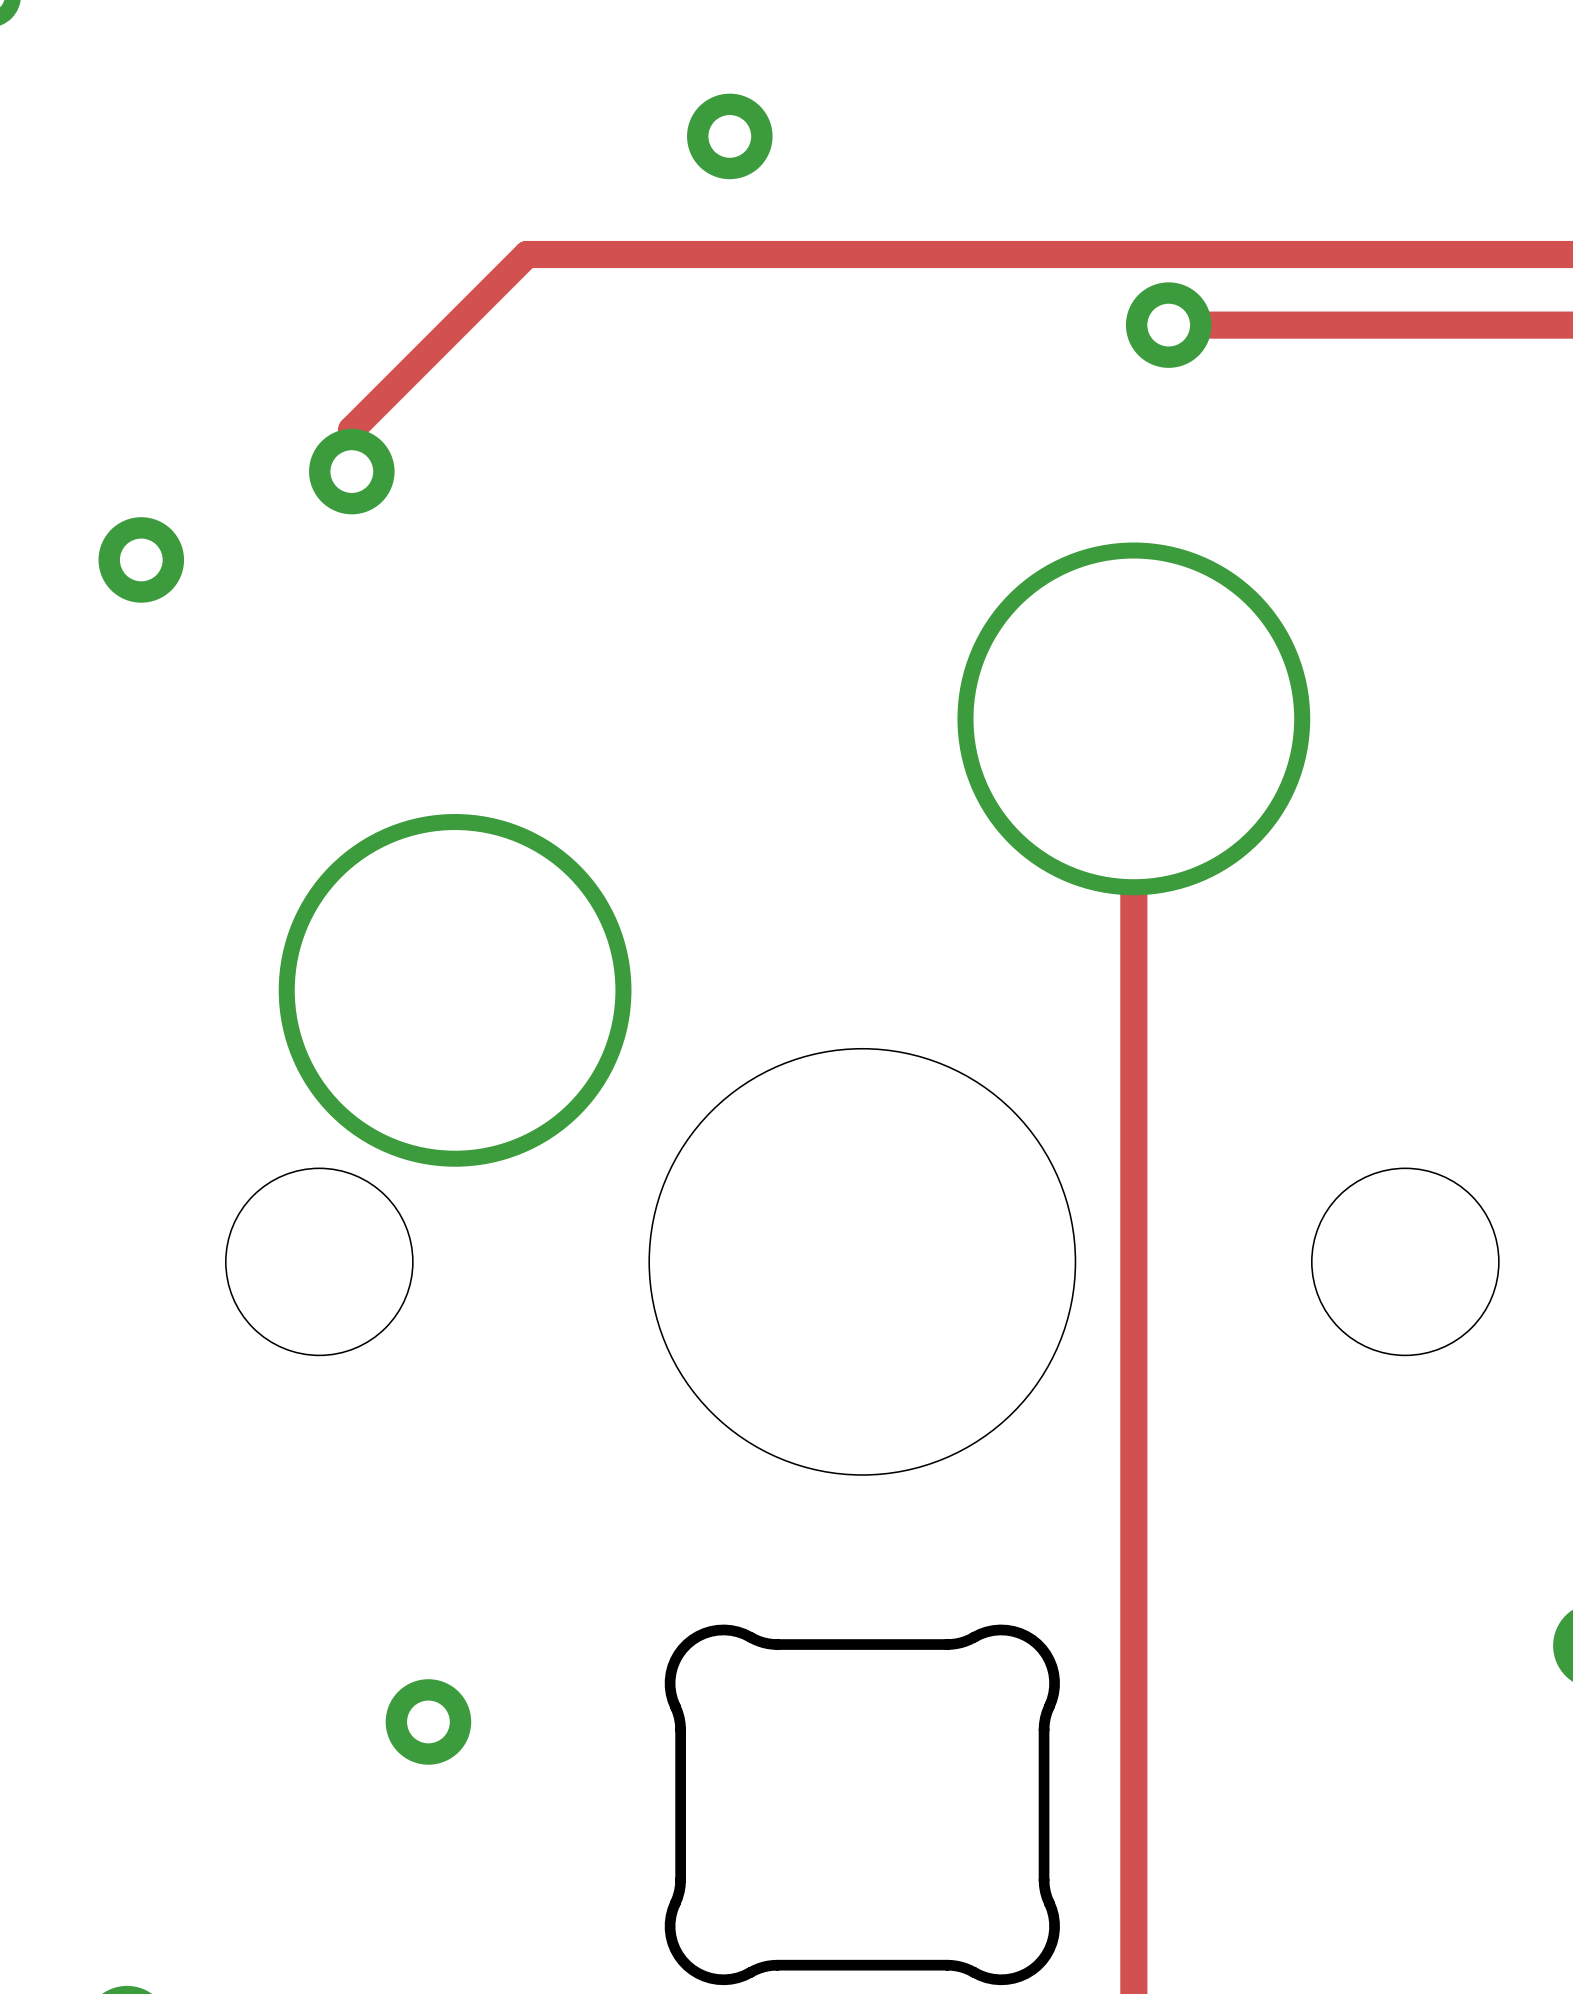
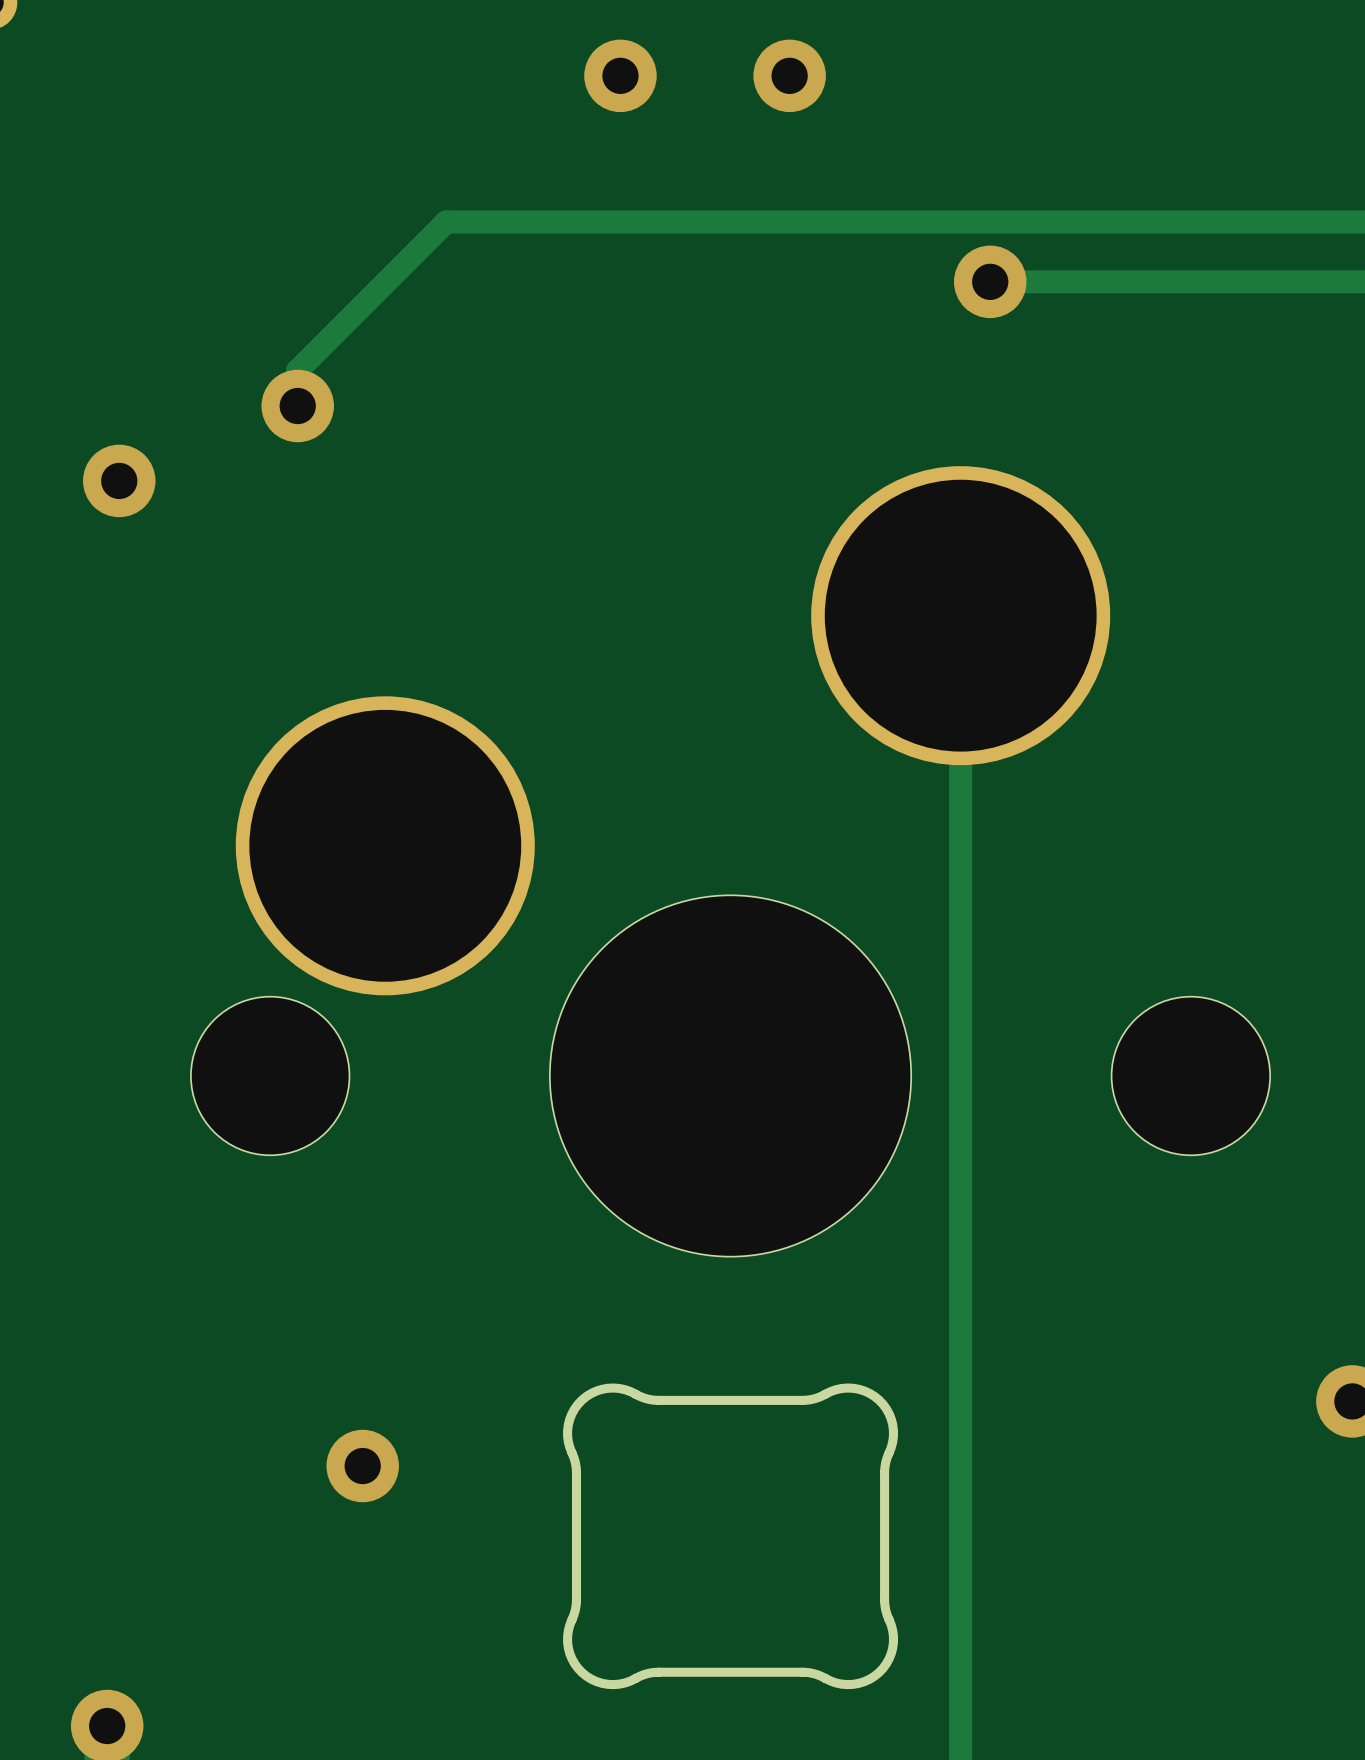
via: none -> (789, 75)
via position: (729, 136) -> (620, 75)

